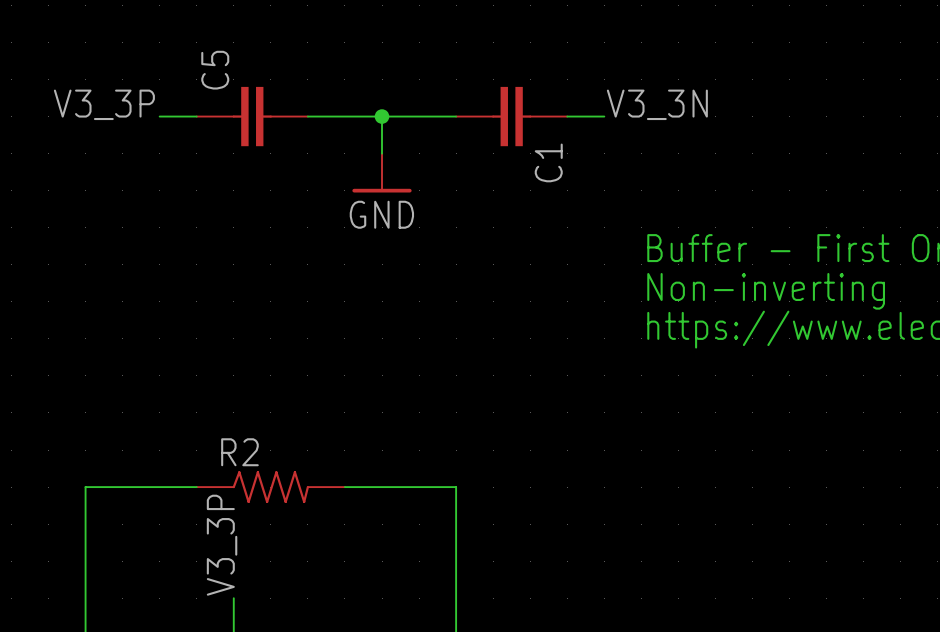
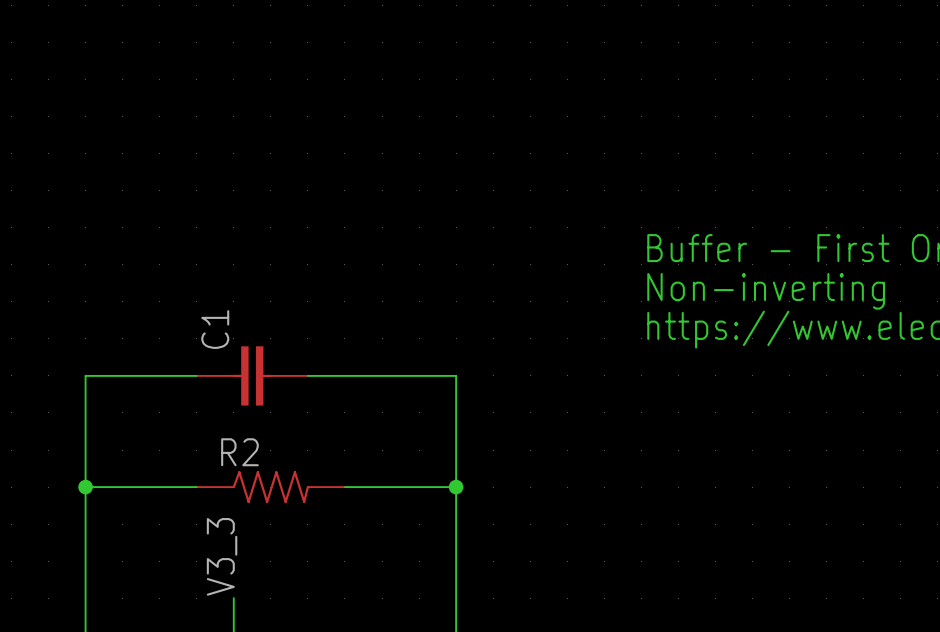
label: V3_3P (104, 104) -> none
label: V3_3N (657, 104) -> none
wire: (159, 116) (196, 116) -> none
C5: (252, 116) -> none
wire: (307, 116) (456, 116) -> none
wire: (382, 116) (382, 153) -> none
junction: (382, 116) -> none
C1 position: (511, 116) -> (252, 375)
wire: (567, 116) (604, 116) -> none
C1 name position: C1 (548, 162) -> C1 (215, 329)
power symbol: GND (382, 173) -> none
wire: none -> (196, 375) (85, 375) (85, 487)
wire: none -> (307, 375) (456, 375) (456, 487)
junction: none -> (85, 487)
junction: none -> (456, 487)
label: V3_3P (222, 545) -> V3_3 (222, 556)

